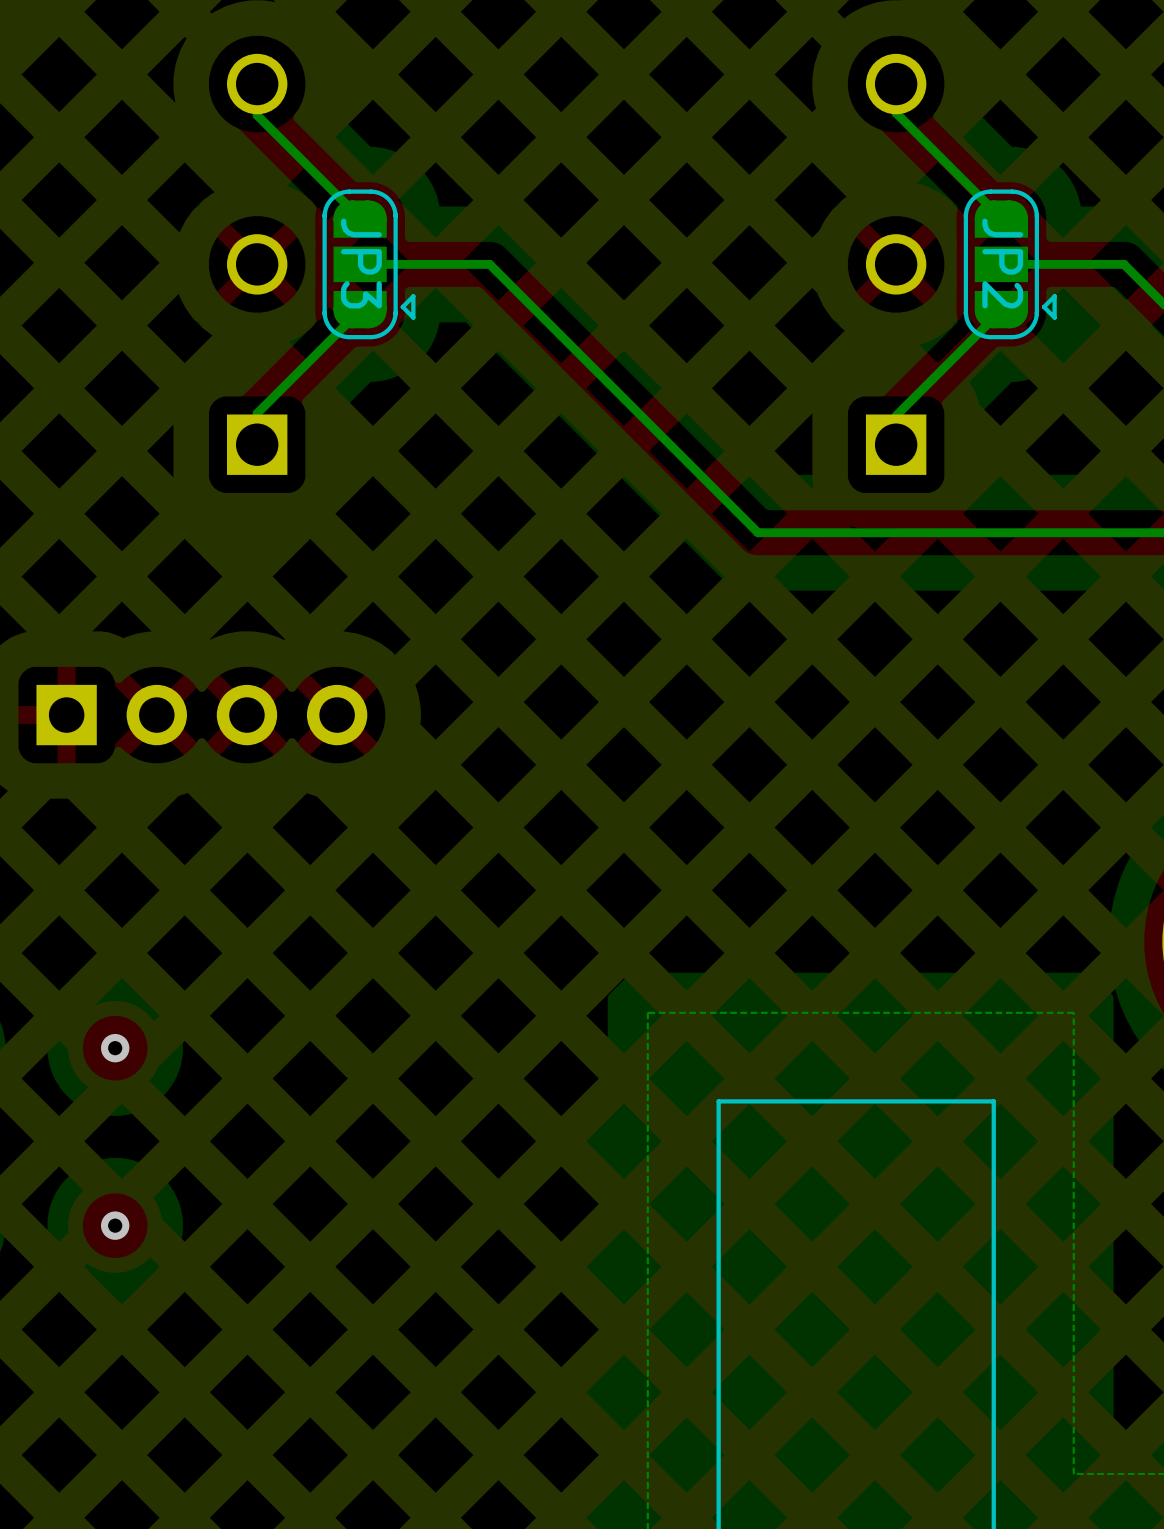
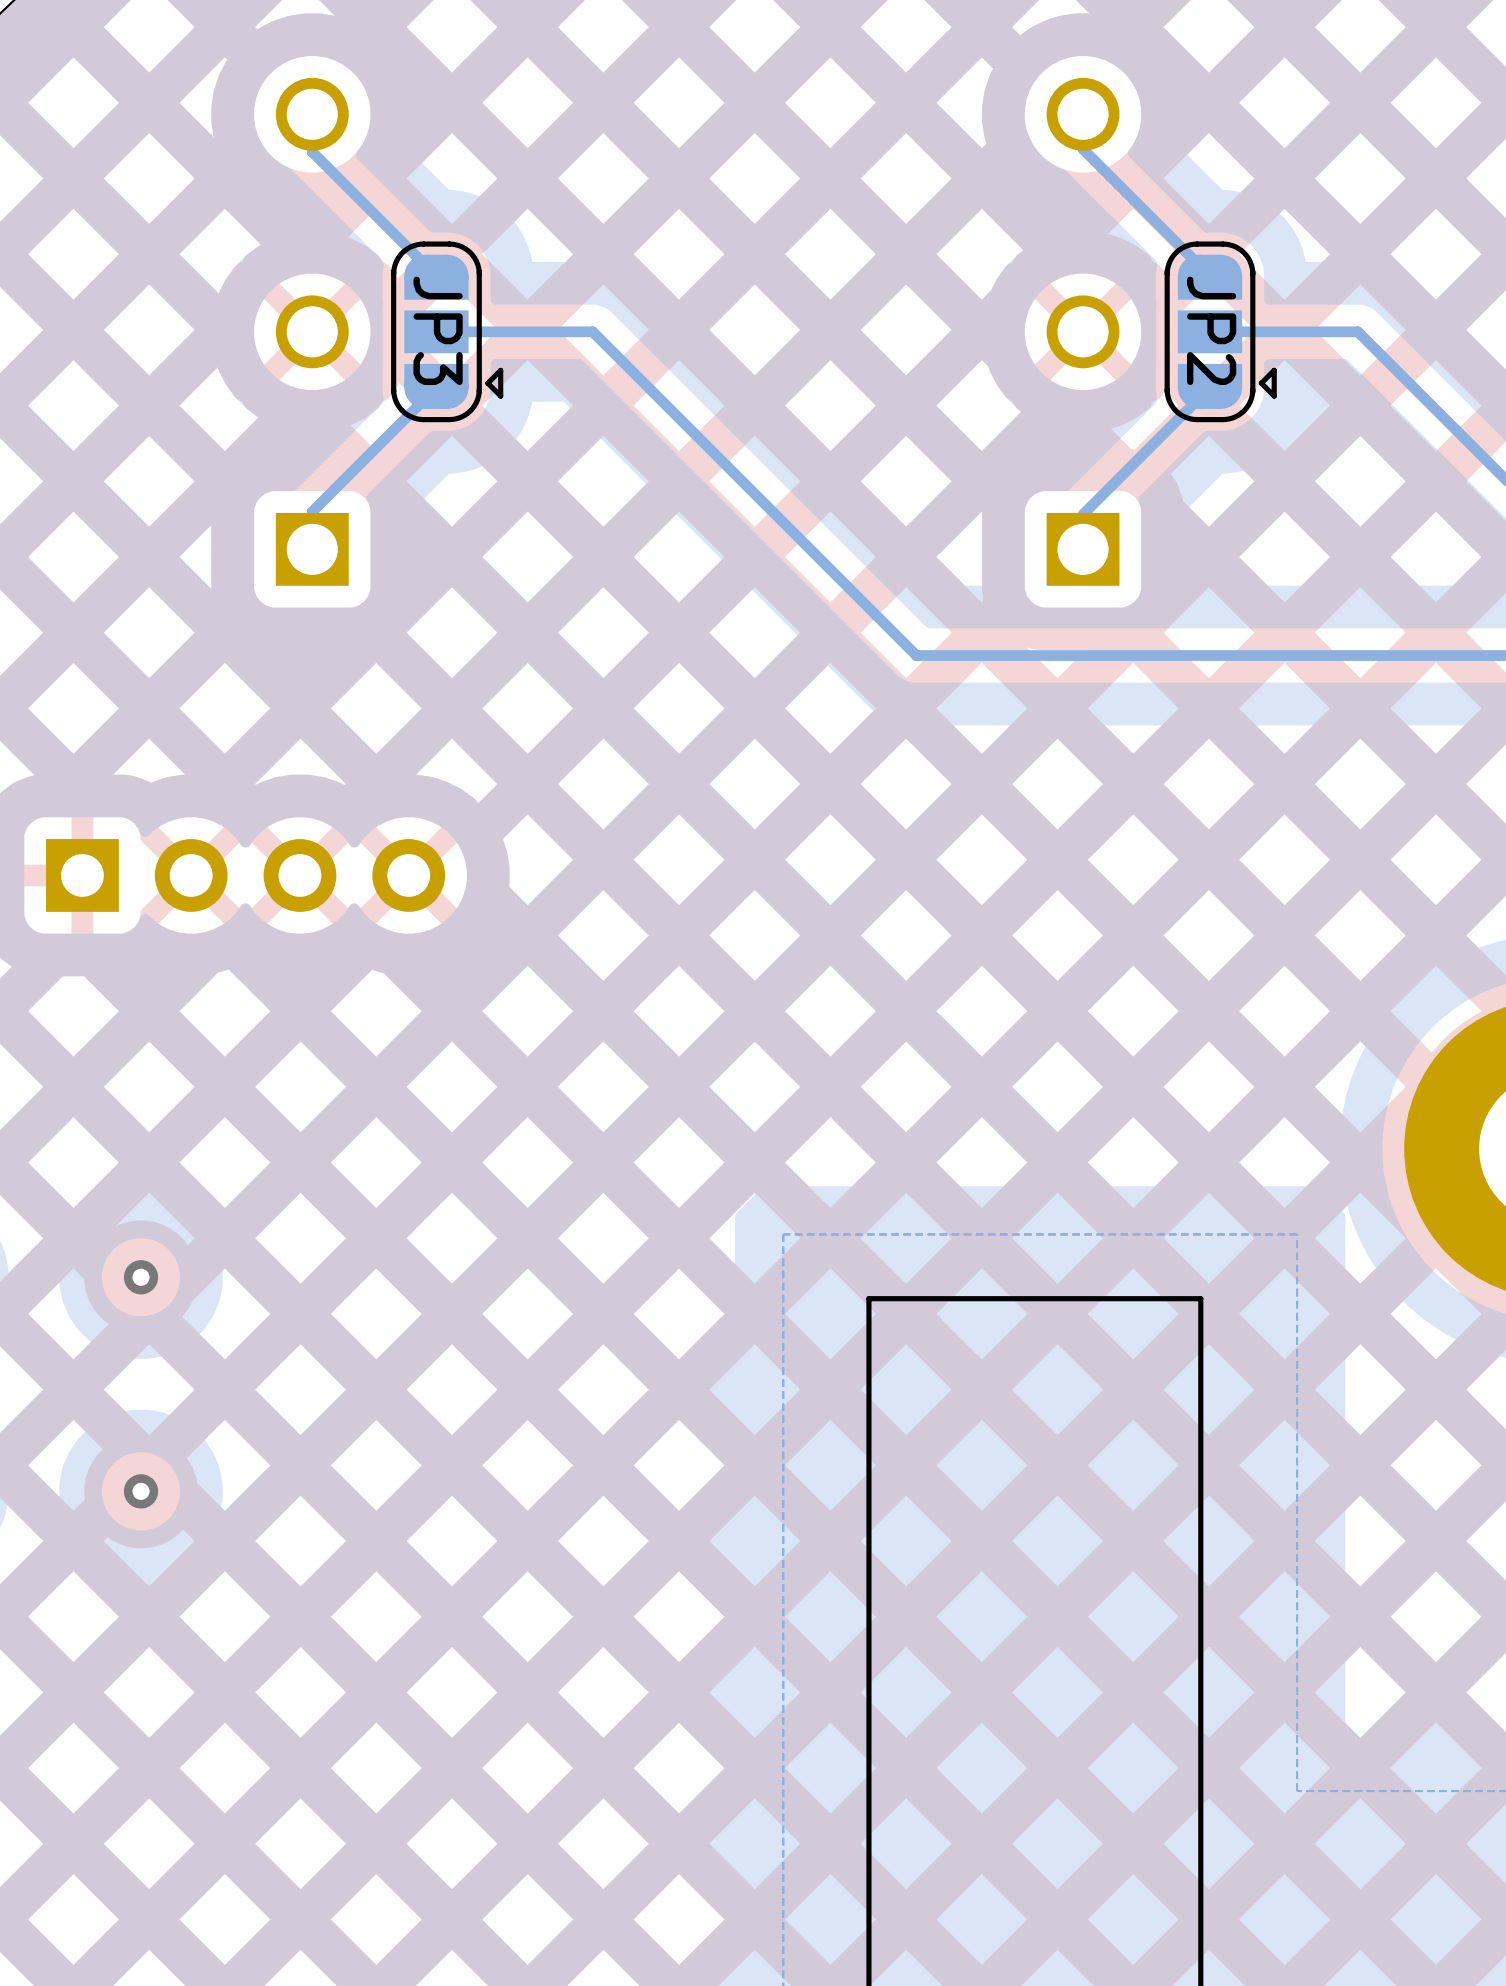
line: (993, 1101) (718, 1101) -> (1200, 1341) (1200, 1298) (868, 1298) (868, 1341)

